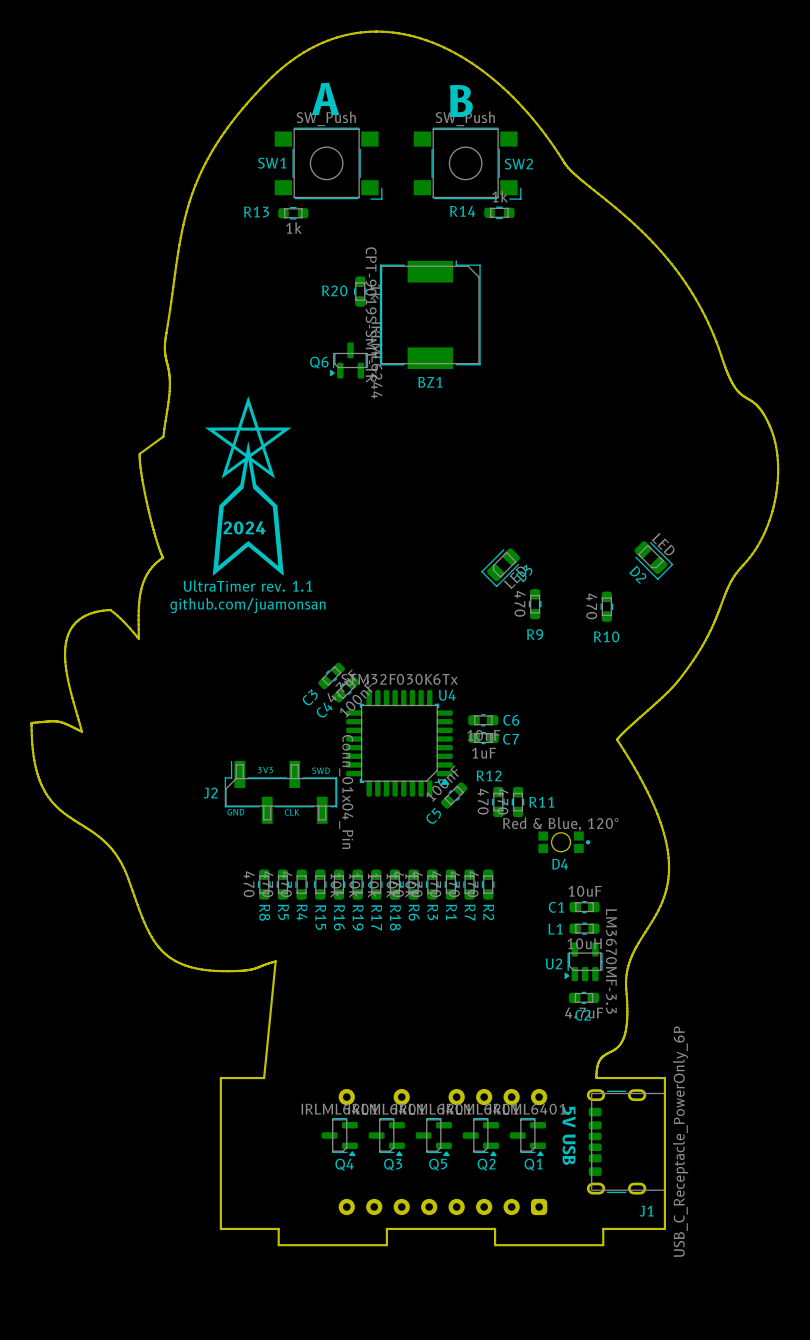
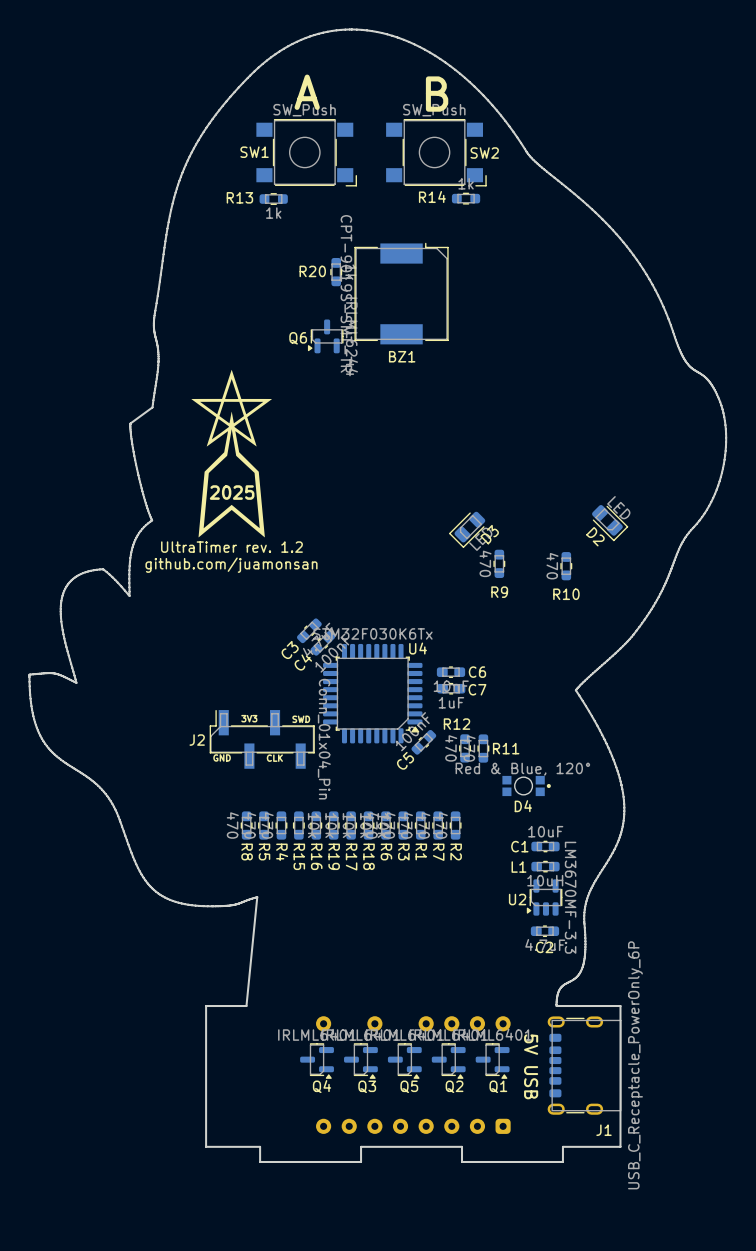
text: 2024 (244, 527) -> 2025 (232, 492)
text: UltraTimer rev. 1.1 (247, 585) -> UltraTimer rev. 1.2 (231, 547)

